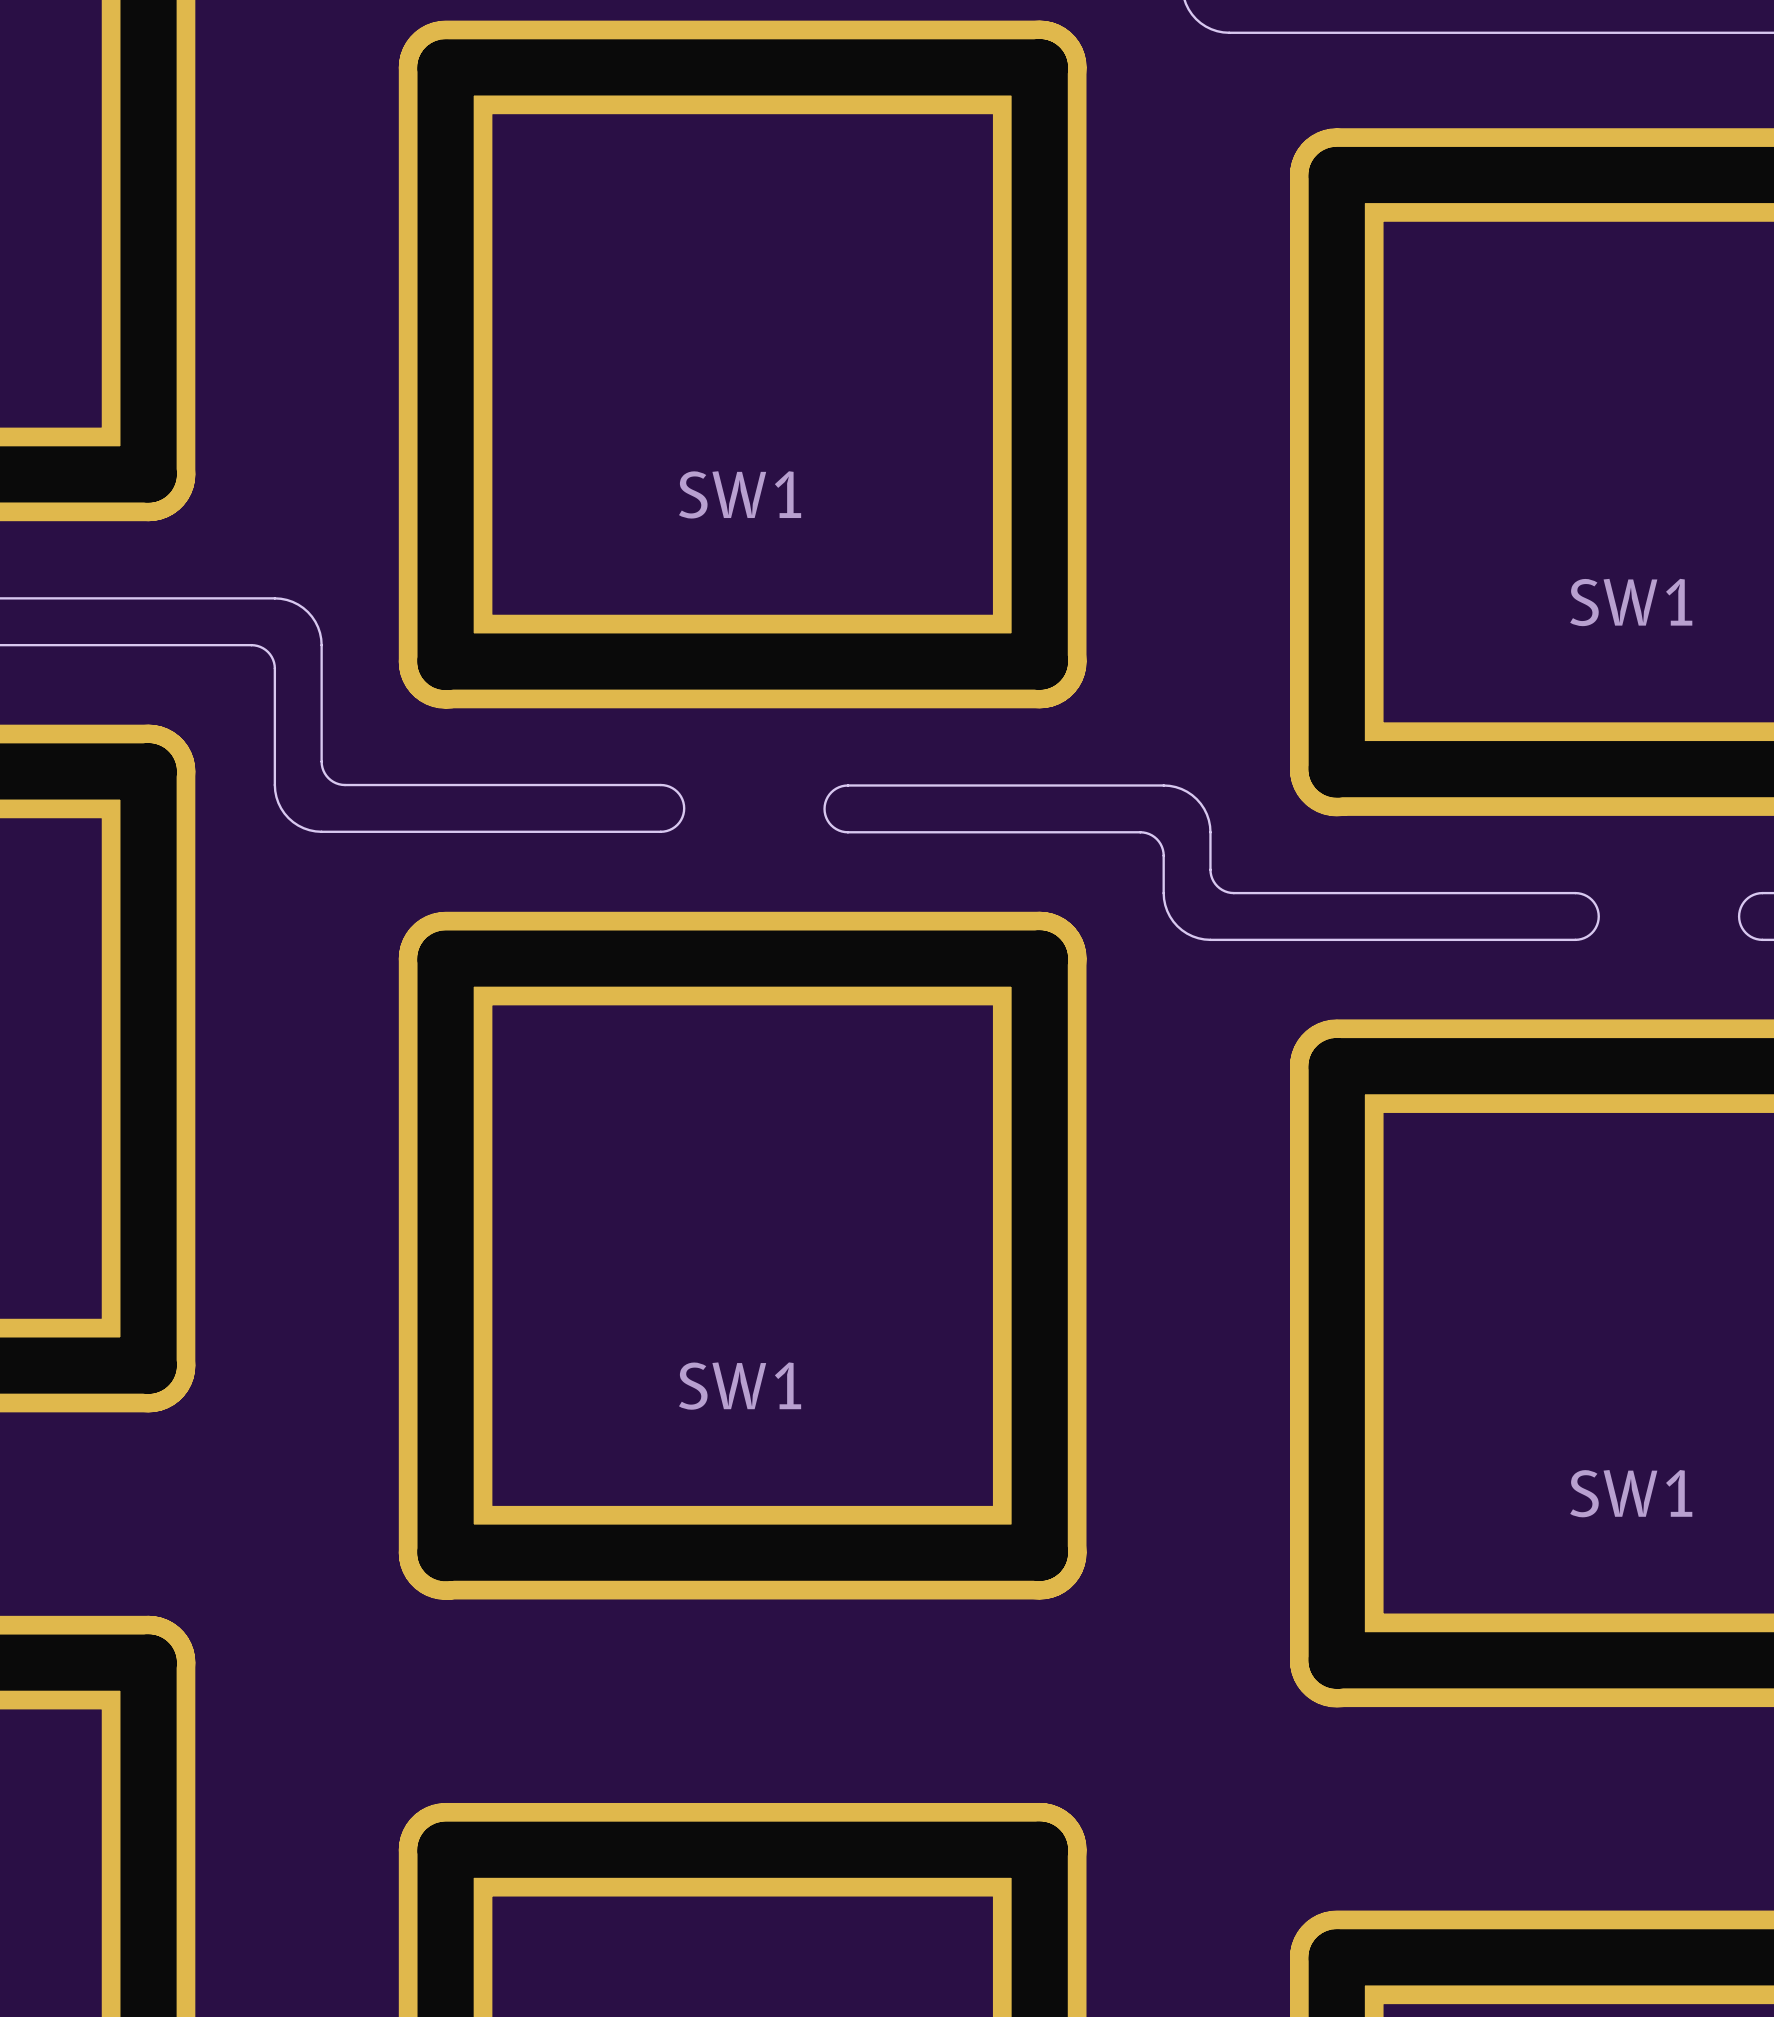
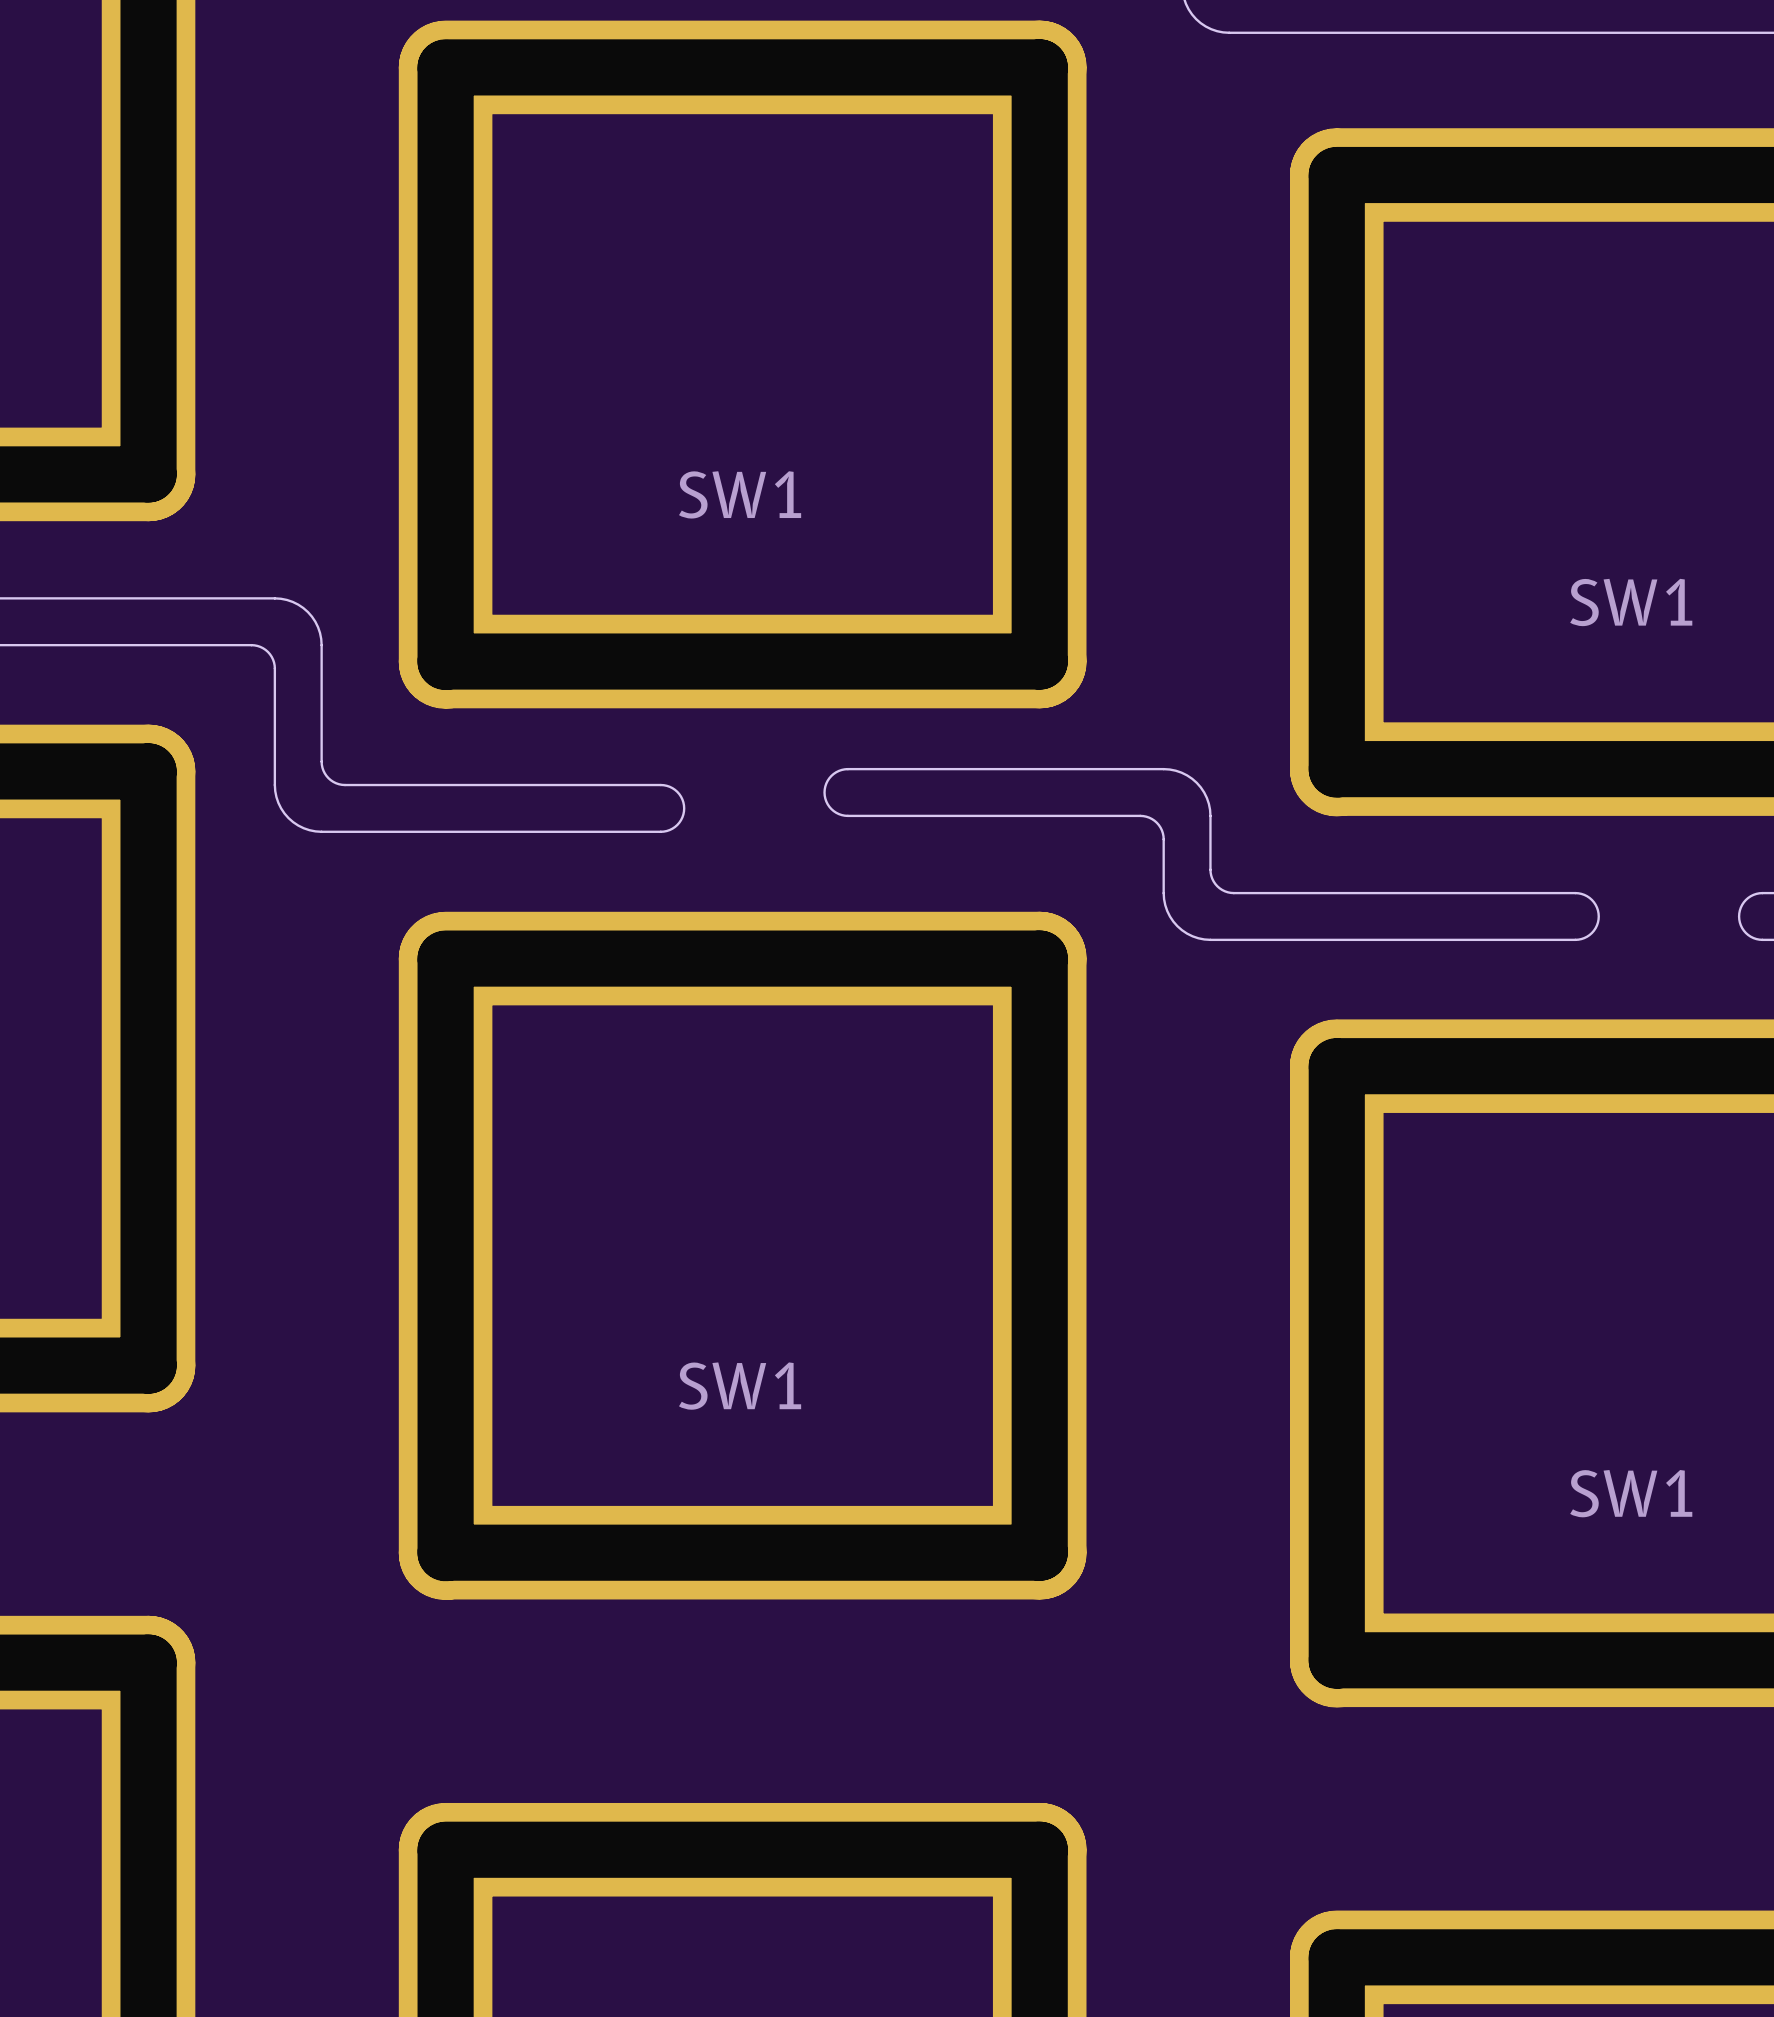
board edge: (1210, 832) (1208, 820) (1200, 803) (1187, 791) (1169, 785) (847, 785) (838, 787) (831, 792) (824, 805) (825, 814) (829, 823) (836, 829) (844, 832) (1143, 832) (1156, 839) (1161, 846) (1163, 855) -> (1210, 832) (1210, 809) (1204, 792) (1196, 782) (1187, 775) (1169, 769) (847, 769) (833, 773) (825, 786) (825, 798) (829, 806) (836, 812) (844, 815) (1146, 816) (1156, 822) (1161, 830) (1163, 855)

